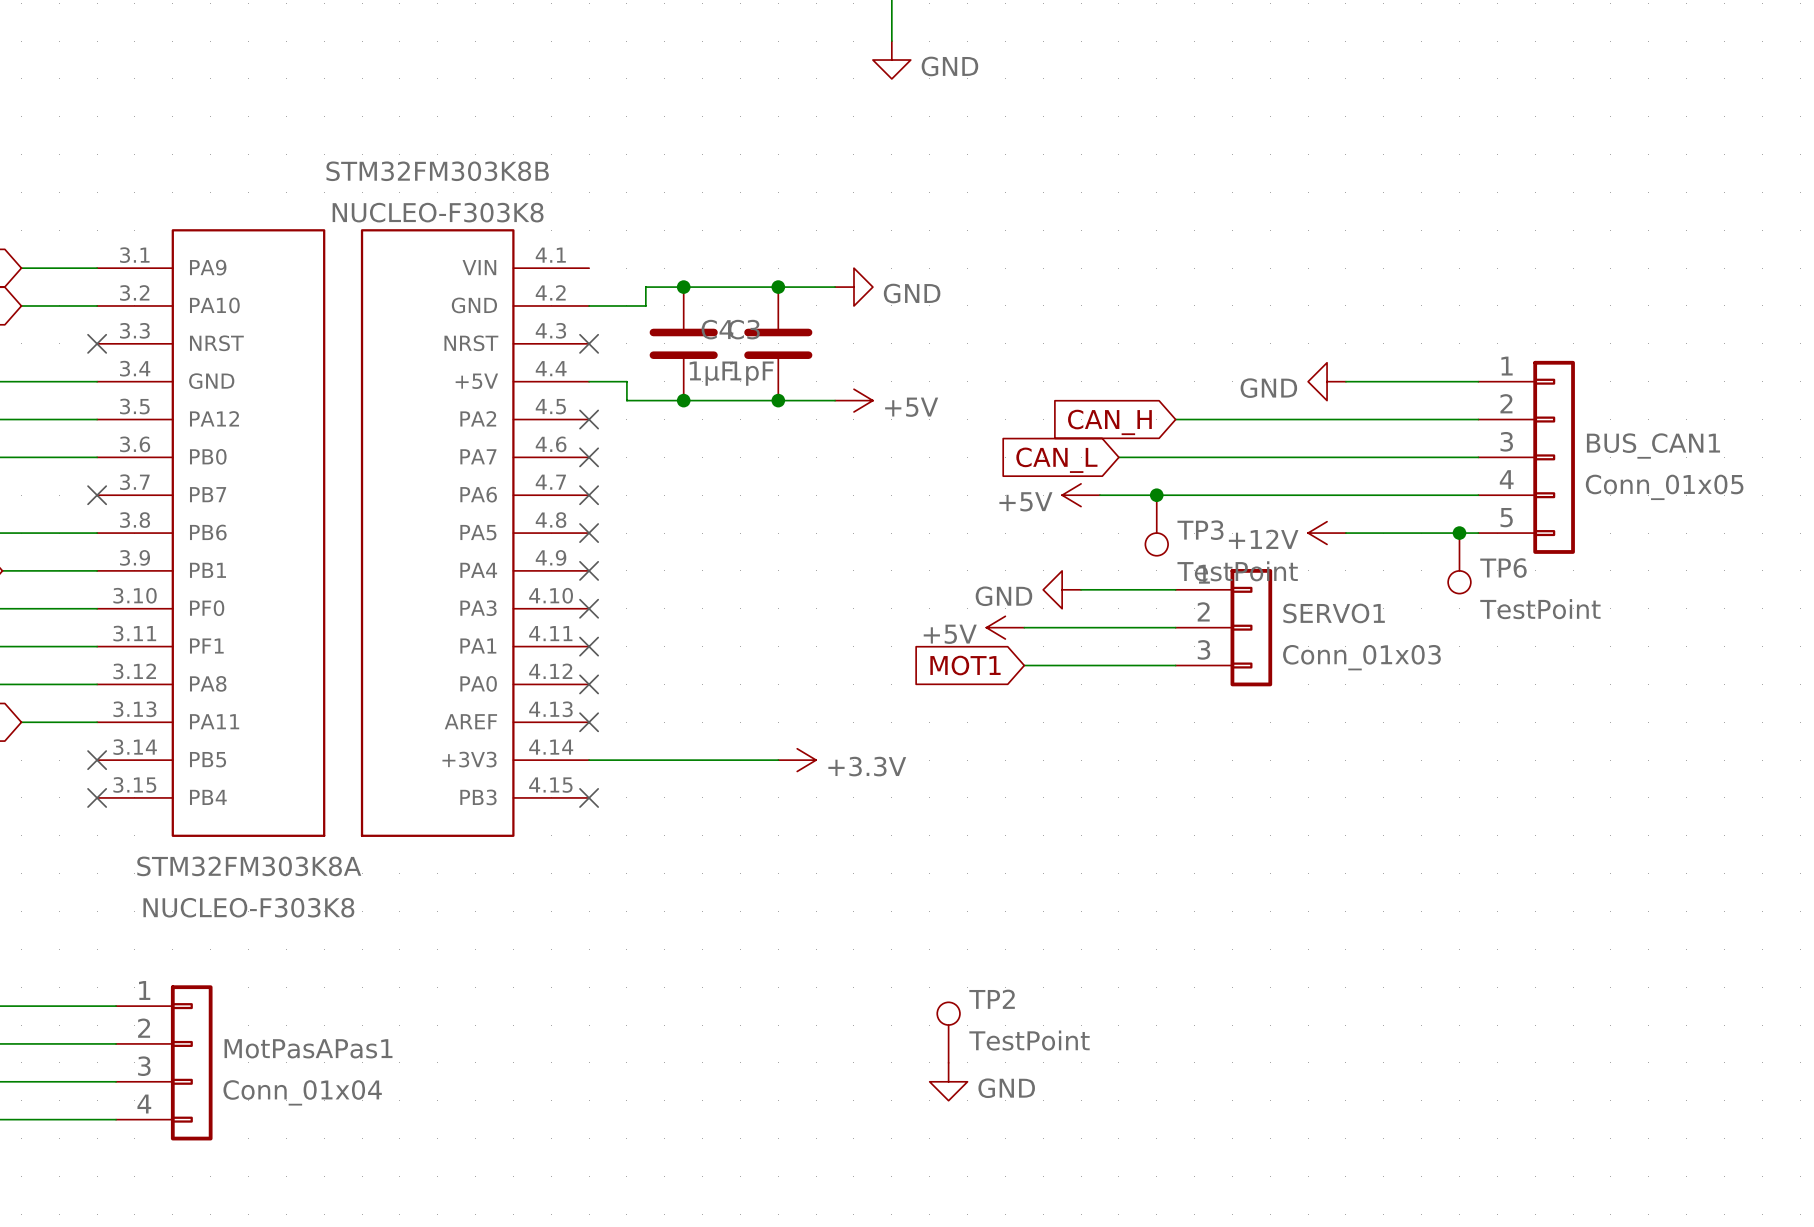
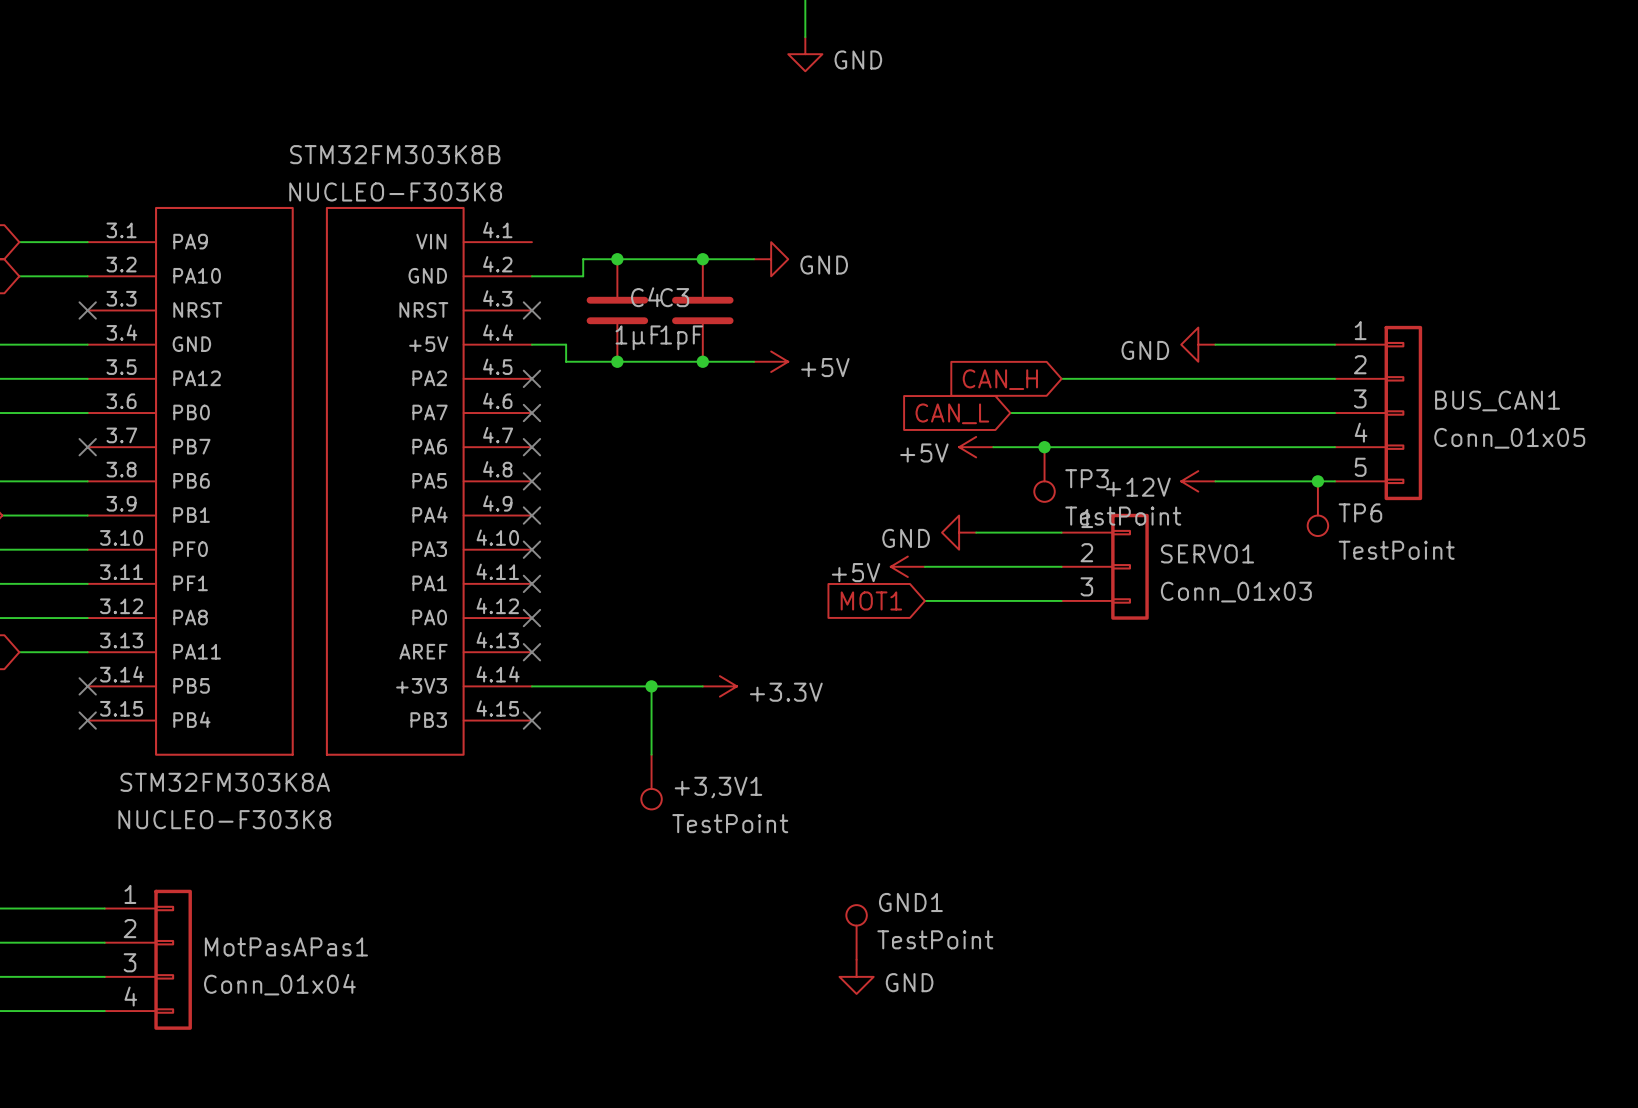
wire: none -> (651, 686) (651, 754)
junction: none -> (651, 686)
+3,3V1: none -> TestPoint (651, 782)
TP2 name: TP2 (992, 999) -> GND1 (910, 902)

